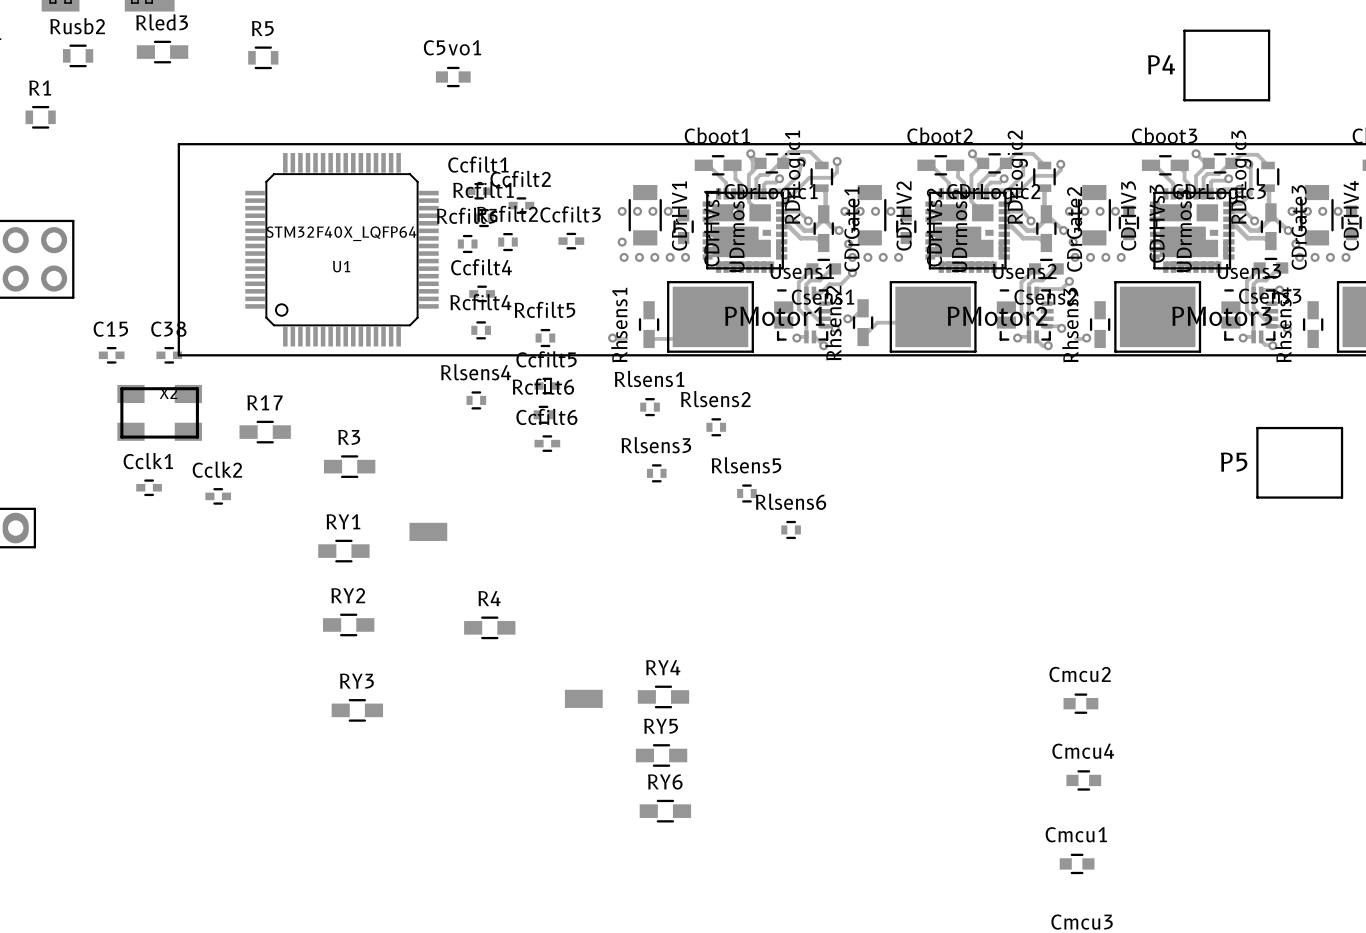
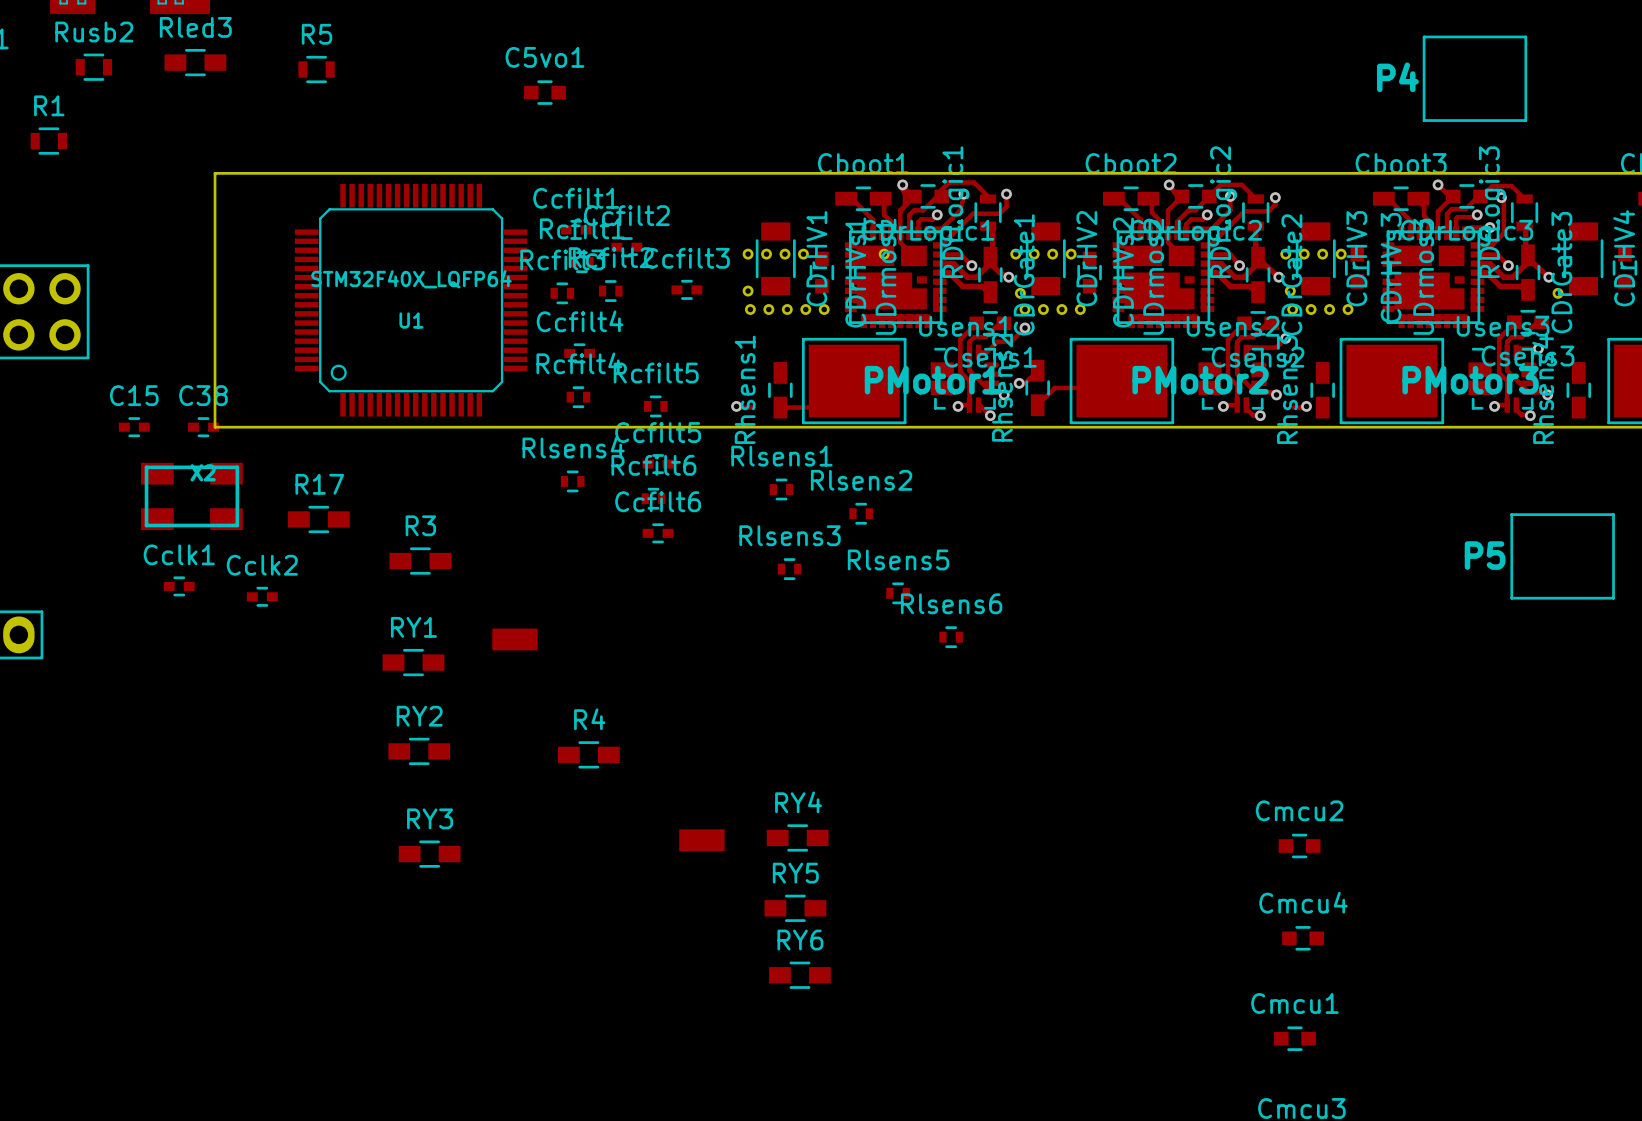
part: (1292, 211) -> none
part: (1307, 211) -> none
part: (1322, 211) -> none
part: (1338, 211) -> none
part: (1299, 257) -> none
part: (1315, 257) -> none
part: (1330, 257) -> none
part: (1345, 257) -> none

